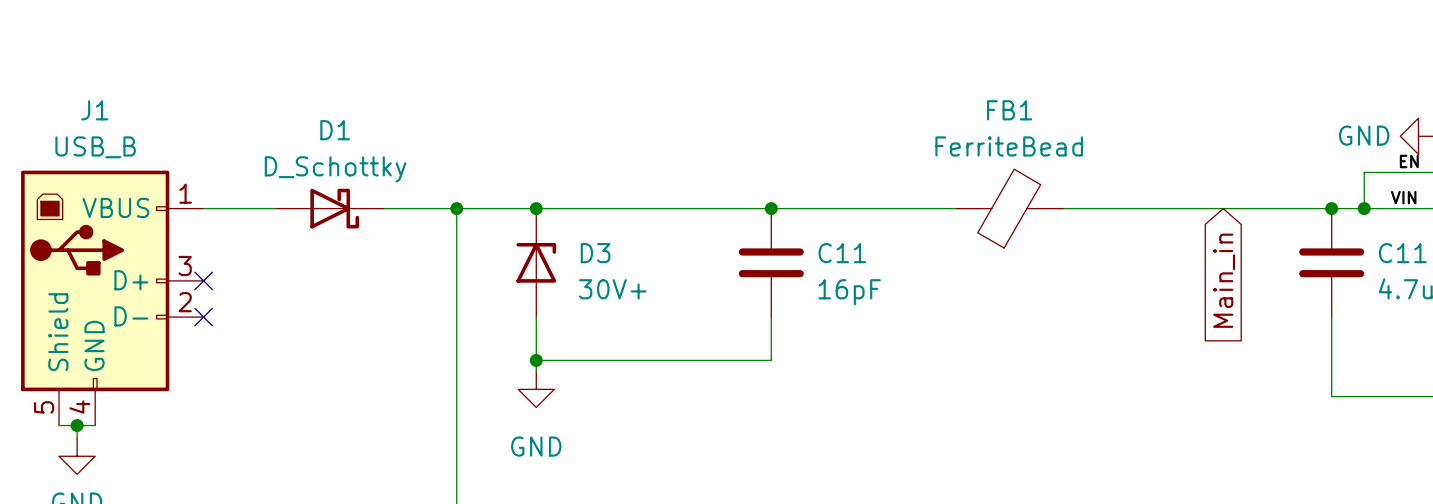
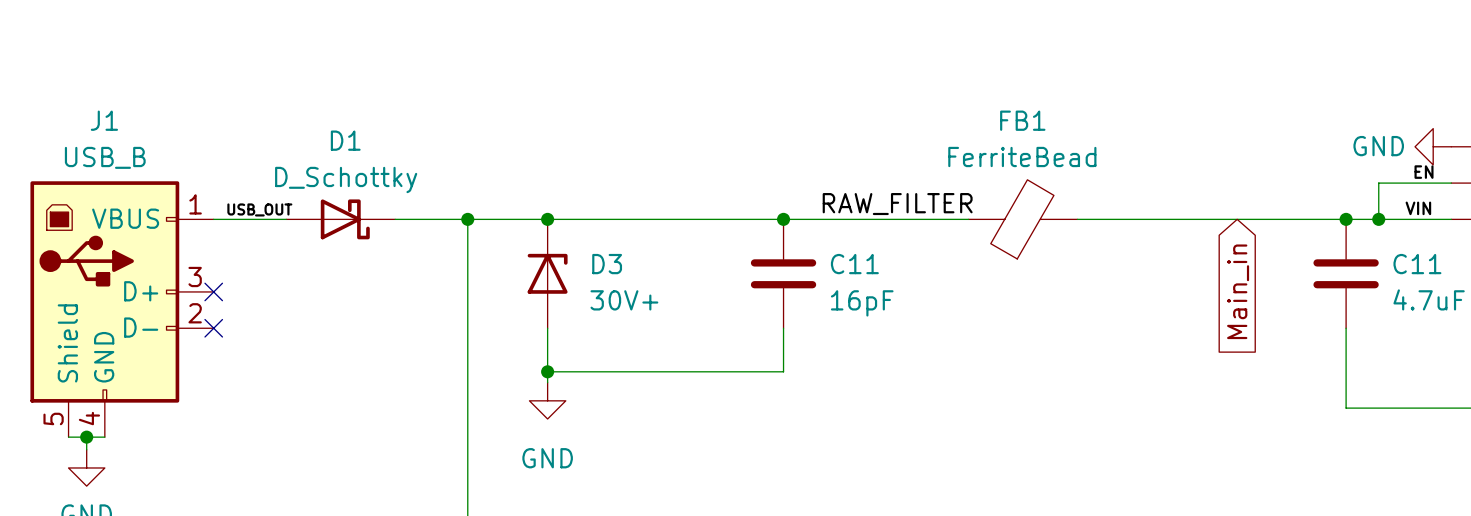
label: none -> RAW_FILTER (897, 204)
label: none -> USB_OUT (259, 209)

